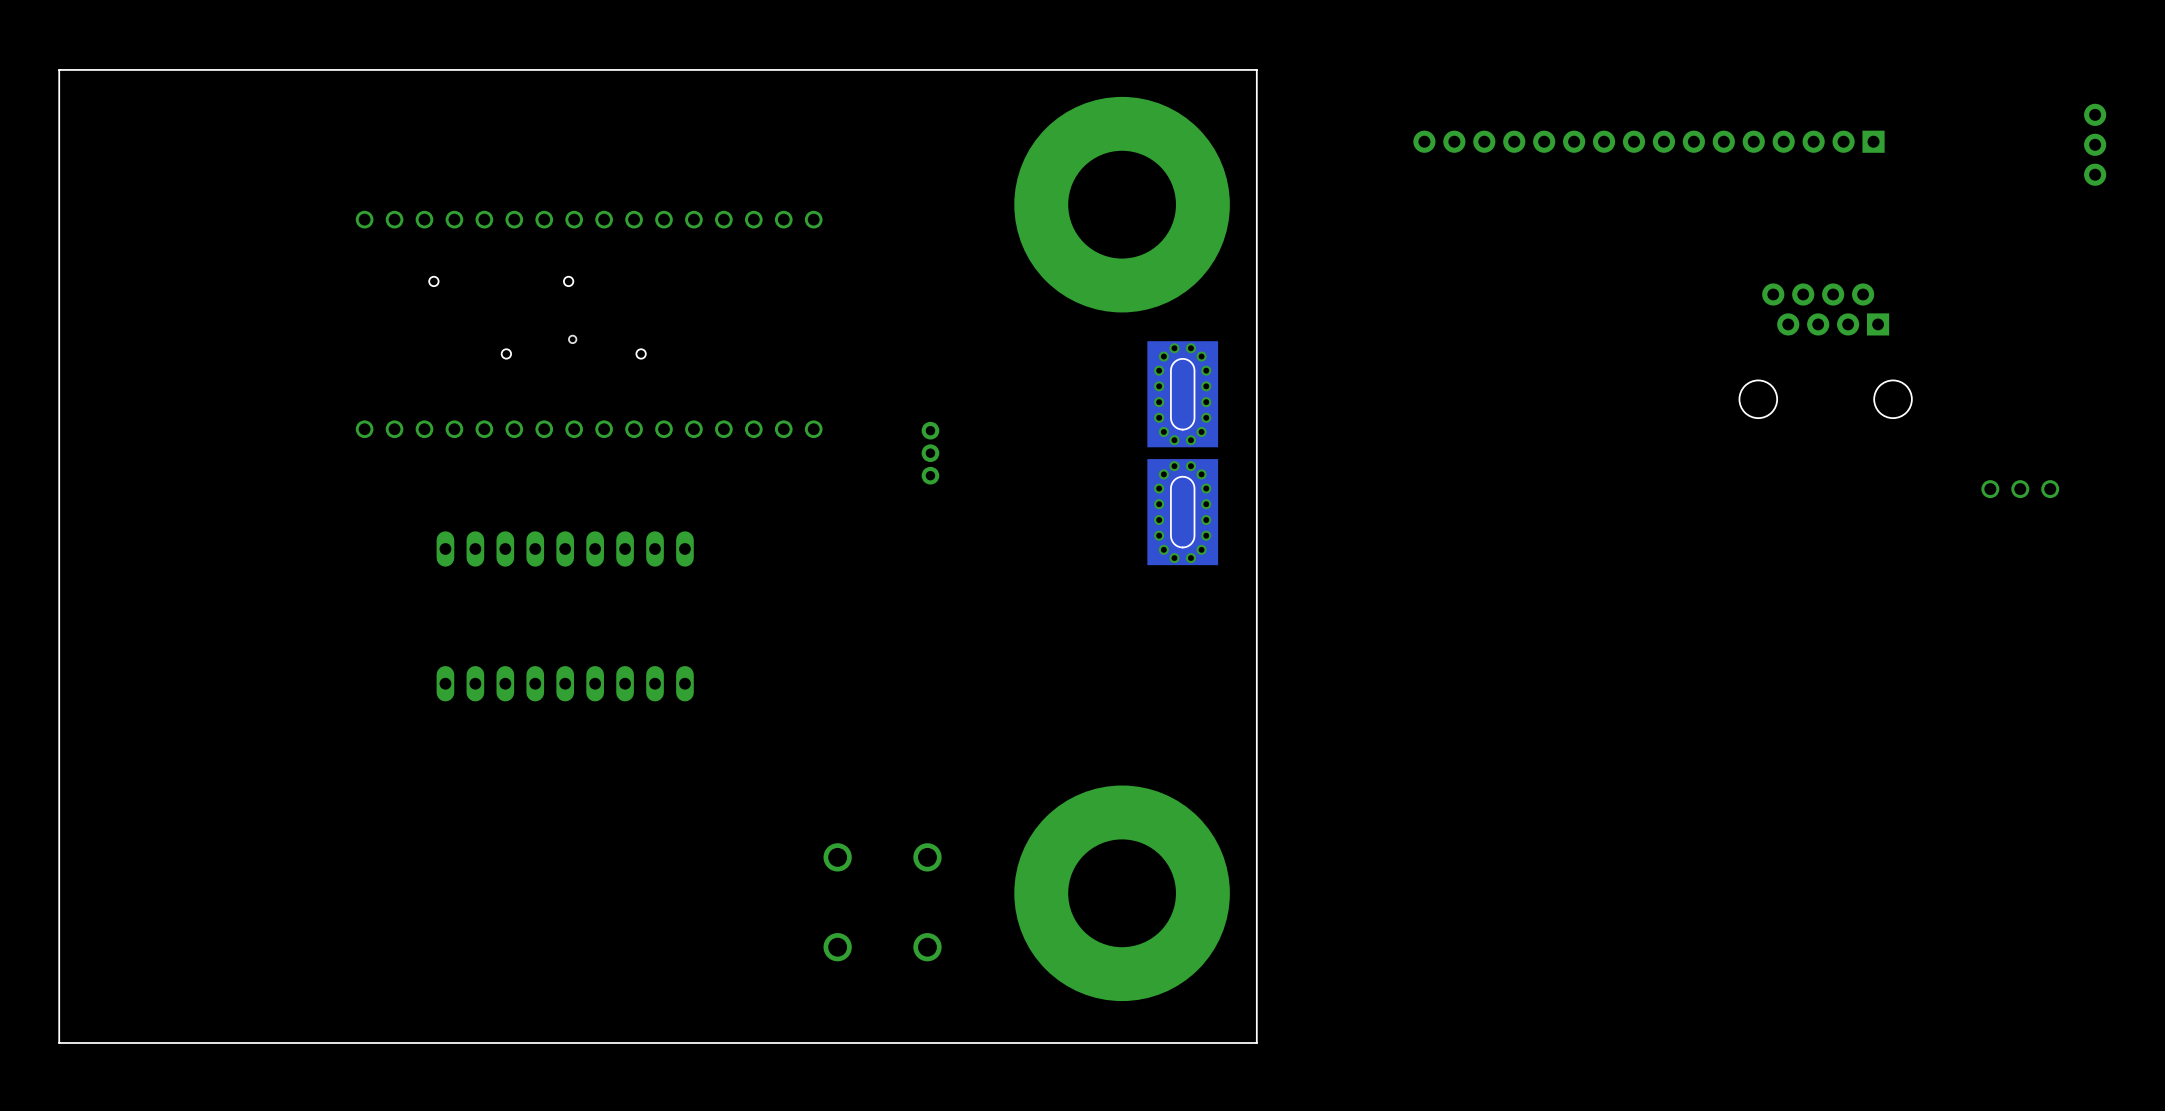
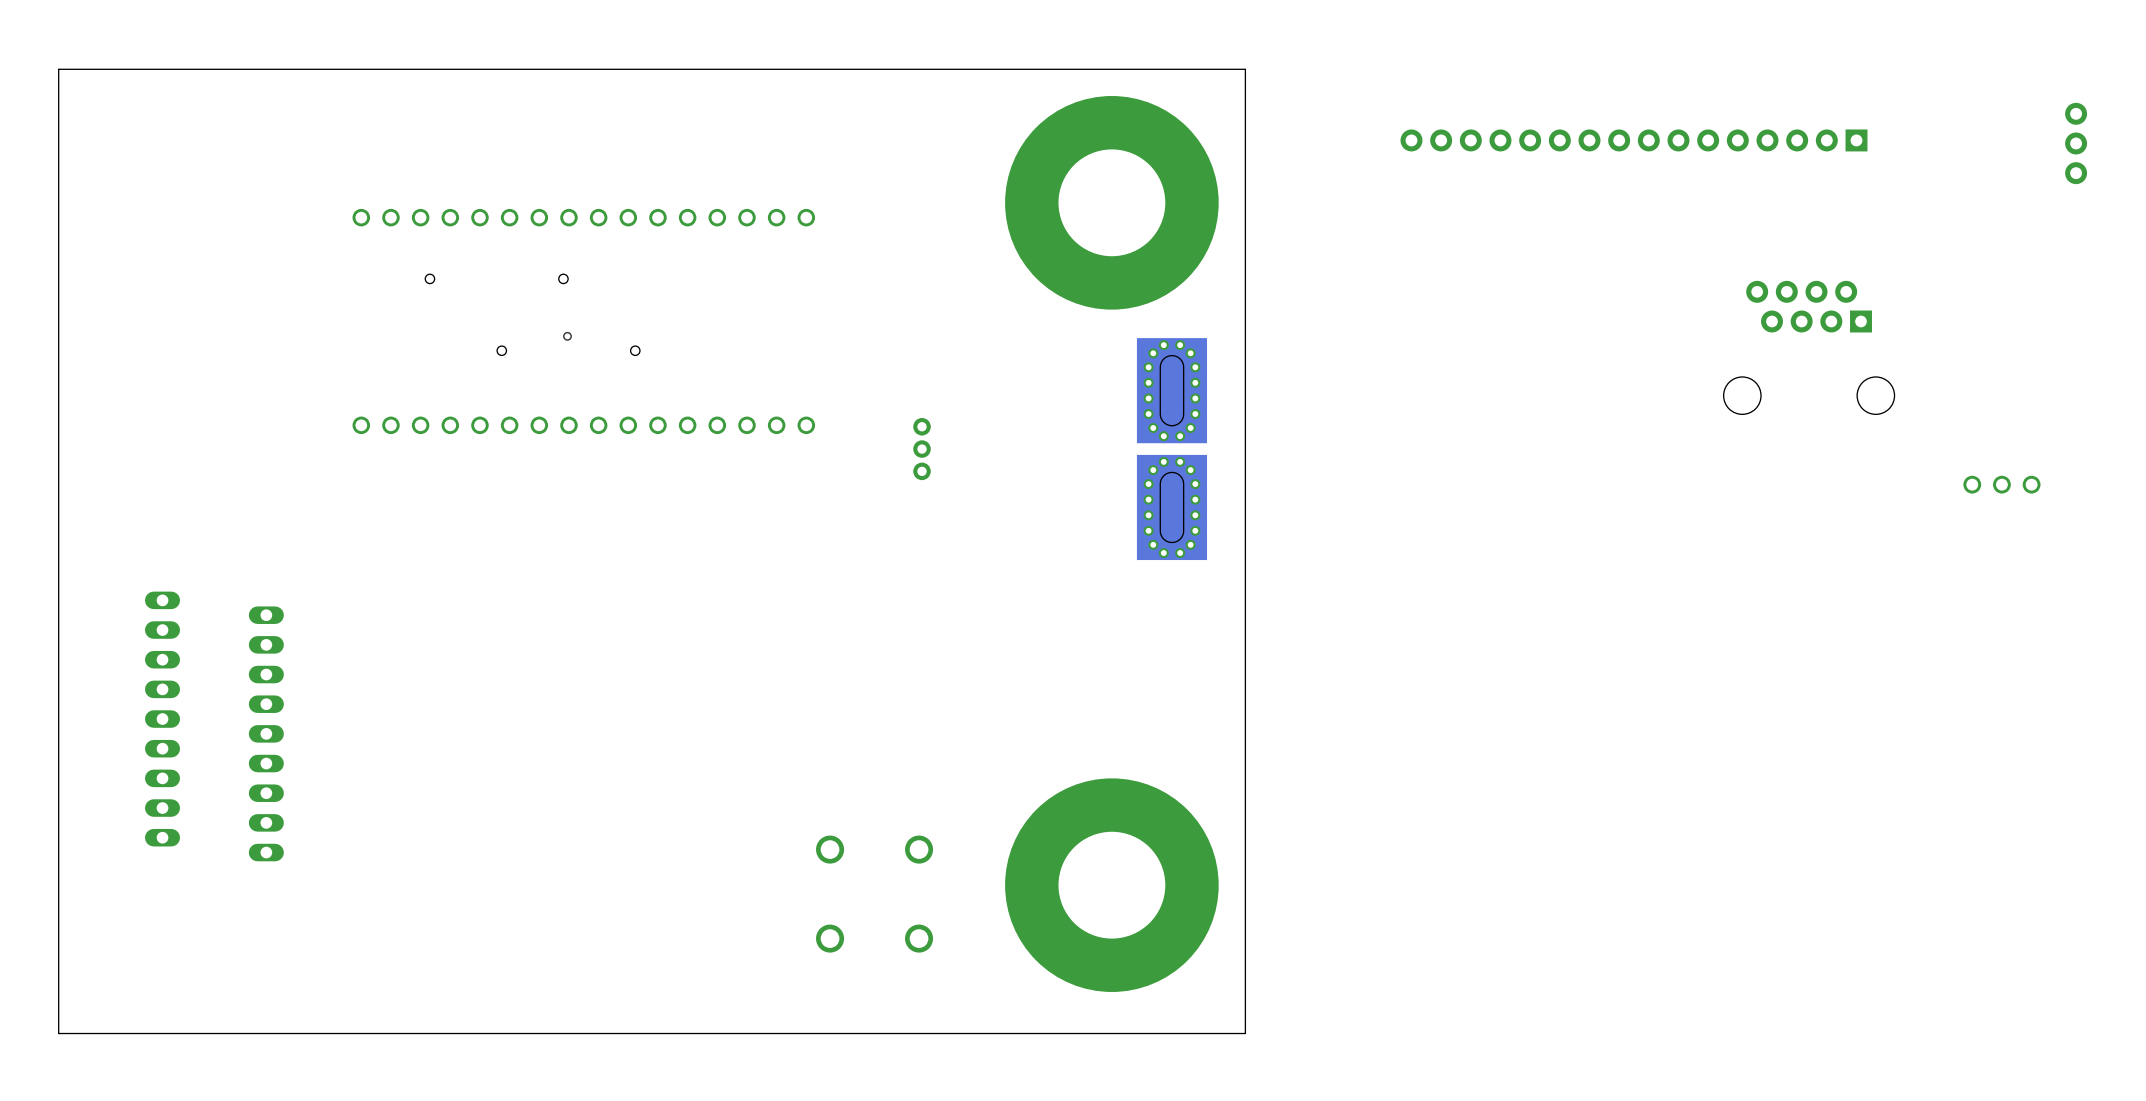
part: (565, 548) -> none
part: (565, 683) -> none
part: none -> (162, 719)
part: none -> (266, 733)

